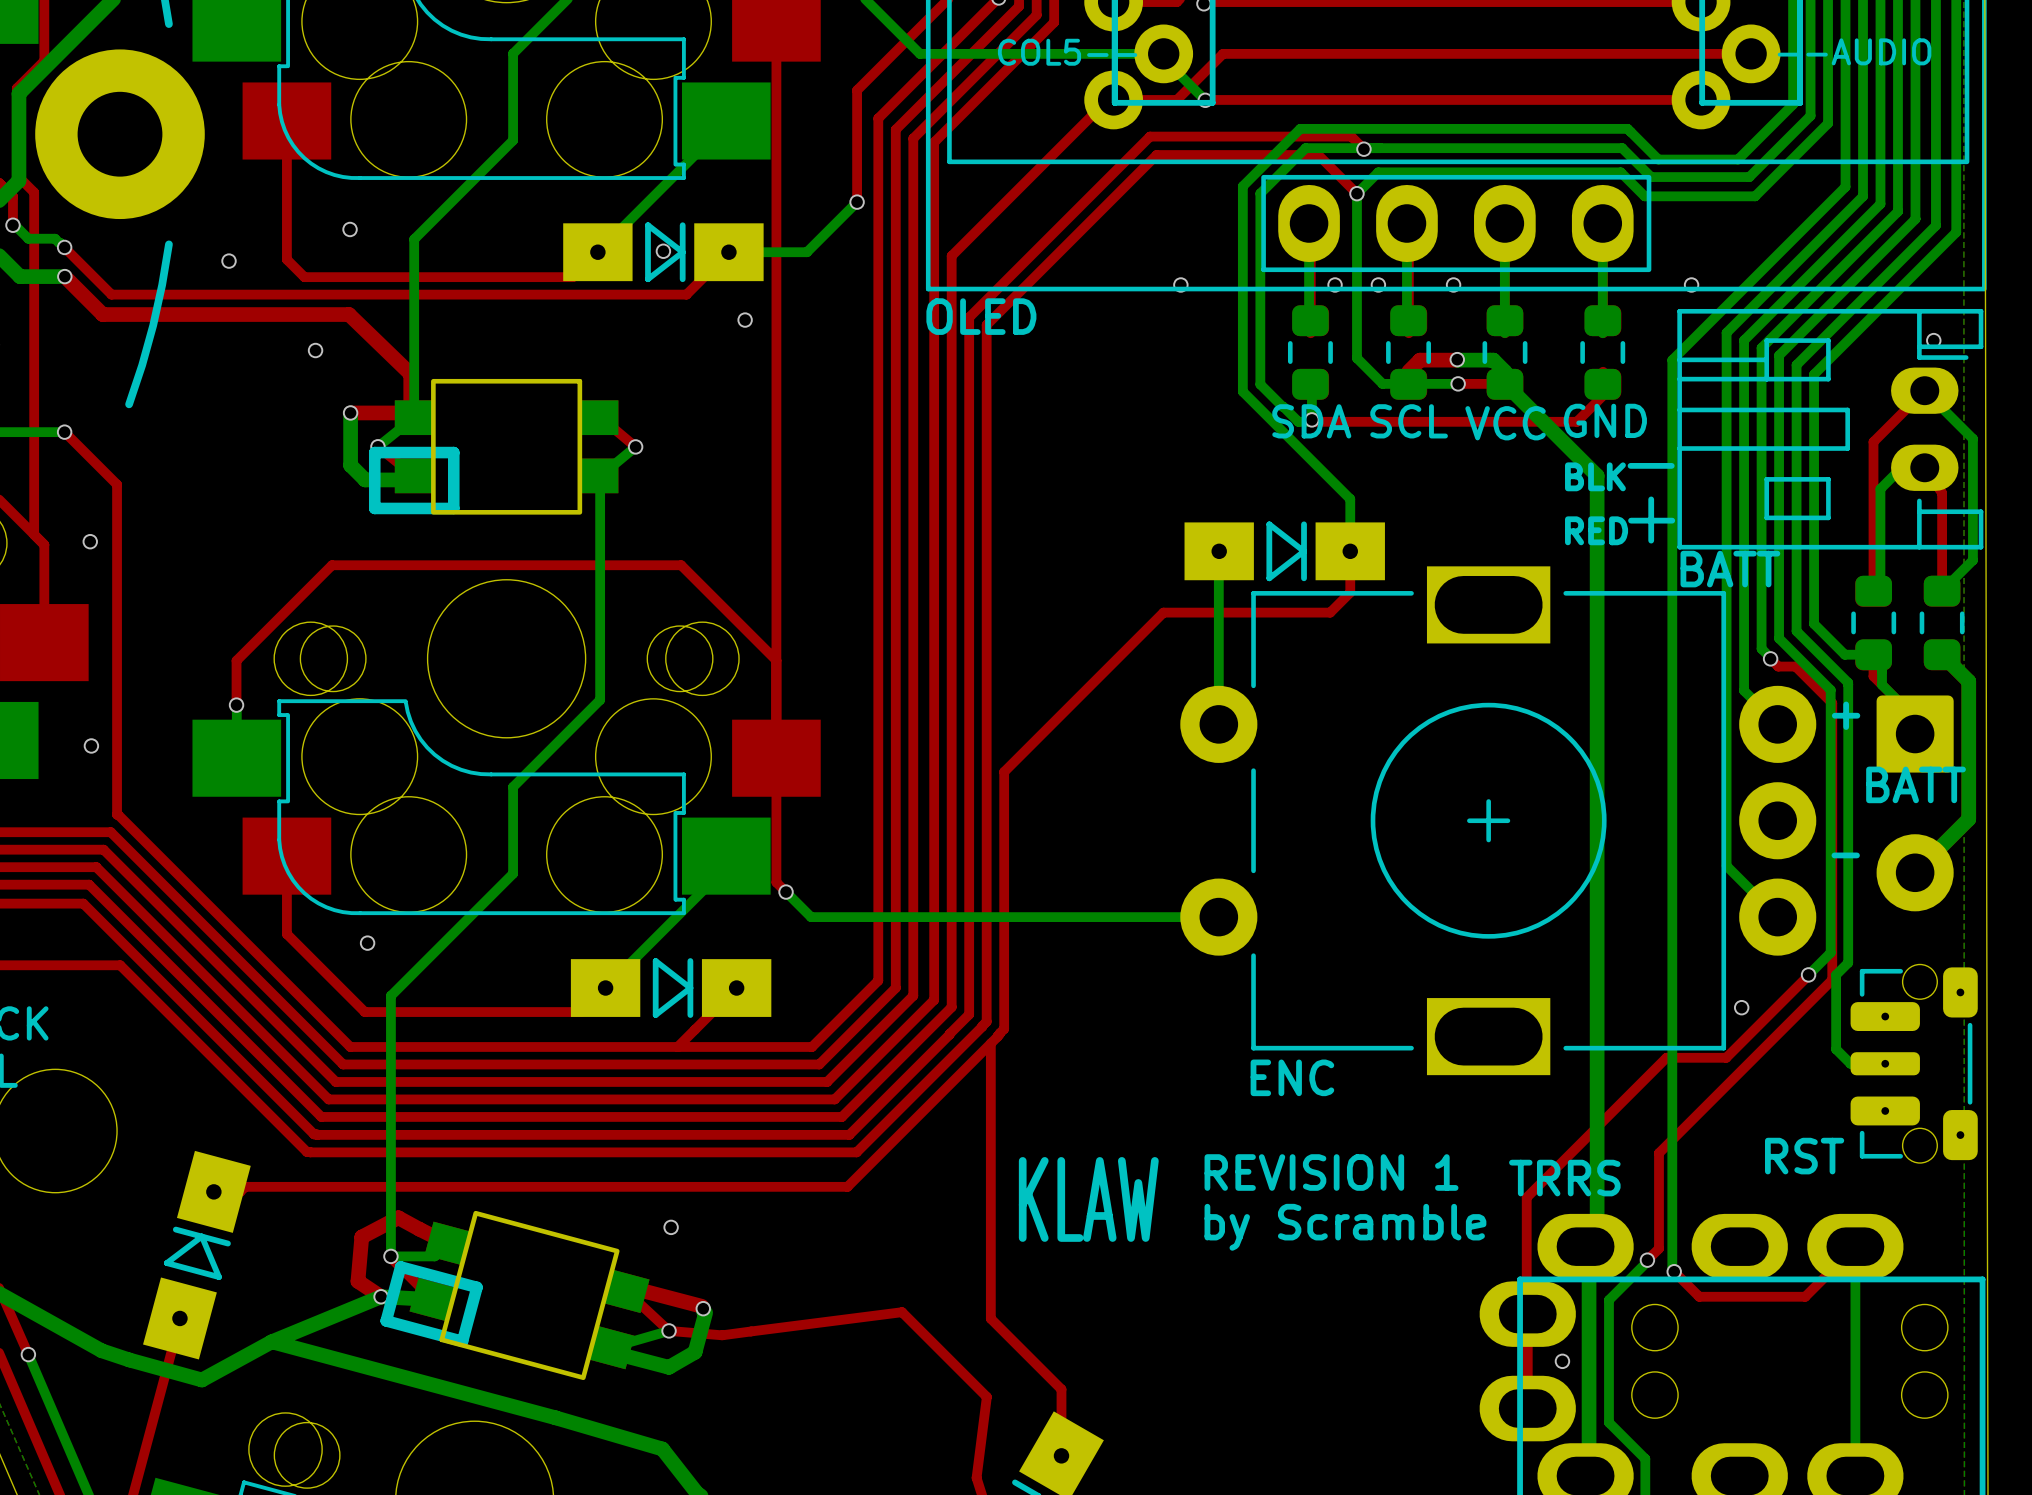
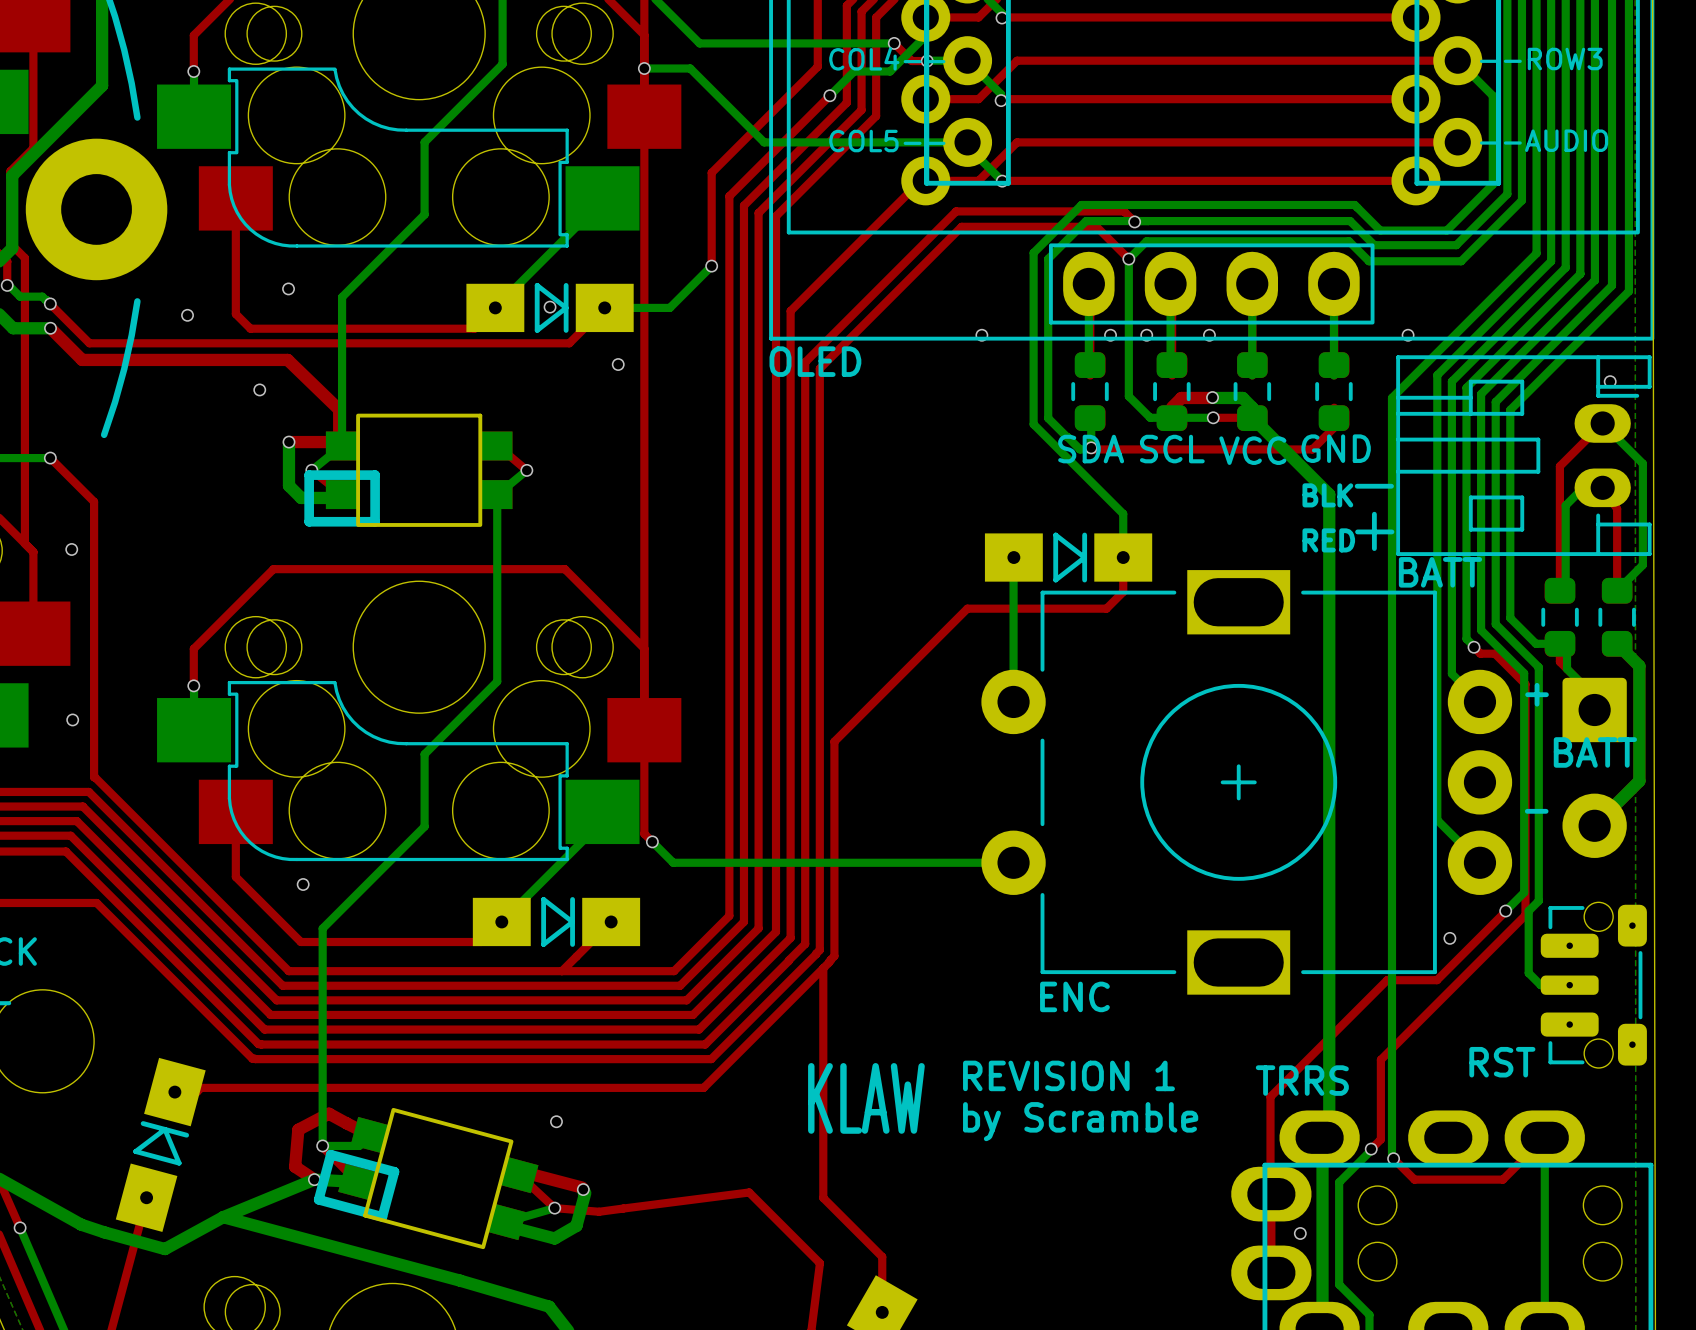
text position: REVISION 1 (1331, 1172) -> REVISION 1 (1068, 1075)
text position: KLAW (1088, 1199) -> KLAW (866, 1098)
text position: by Scramble (1345, 1227) -> by Scramble (1080, 1121)

